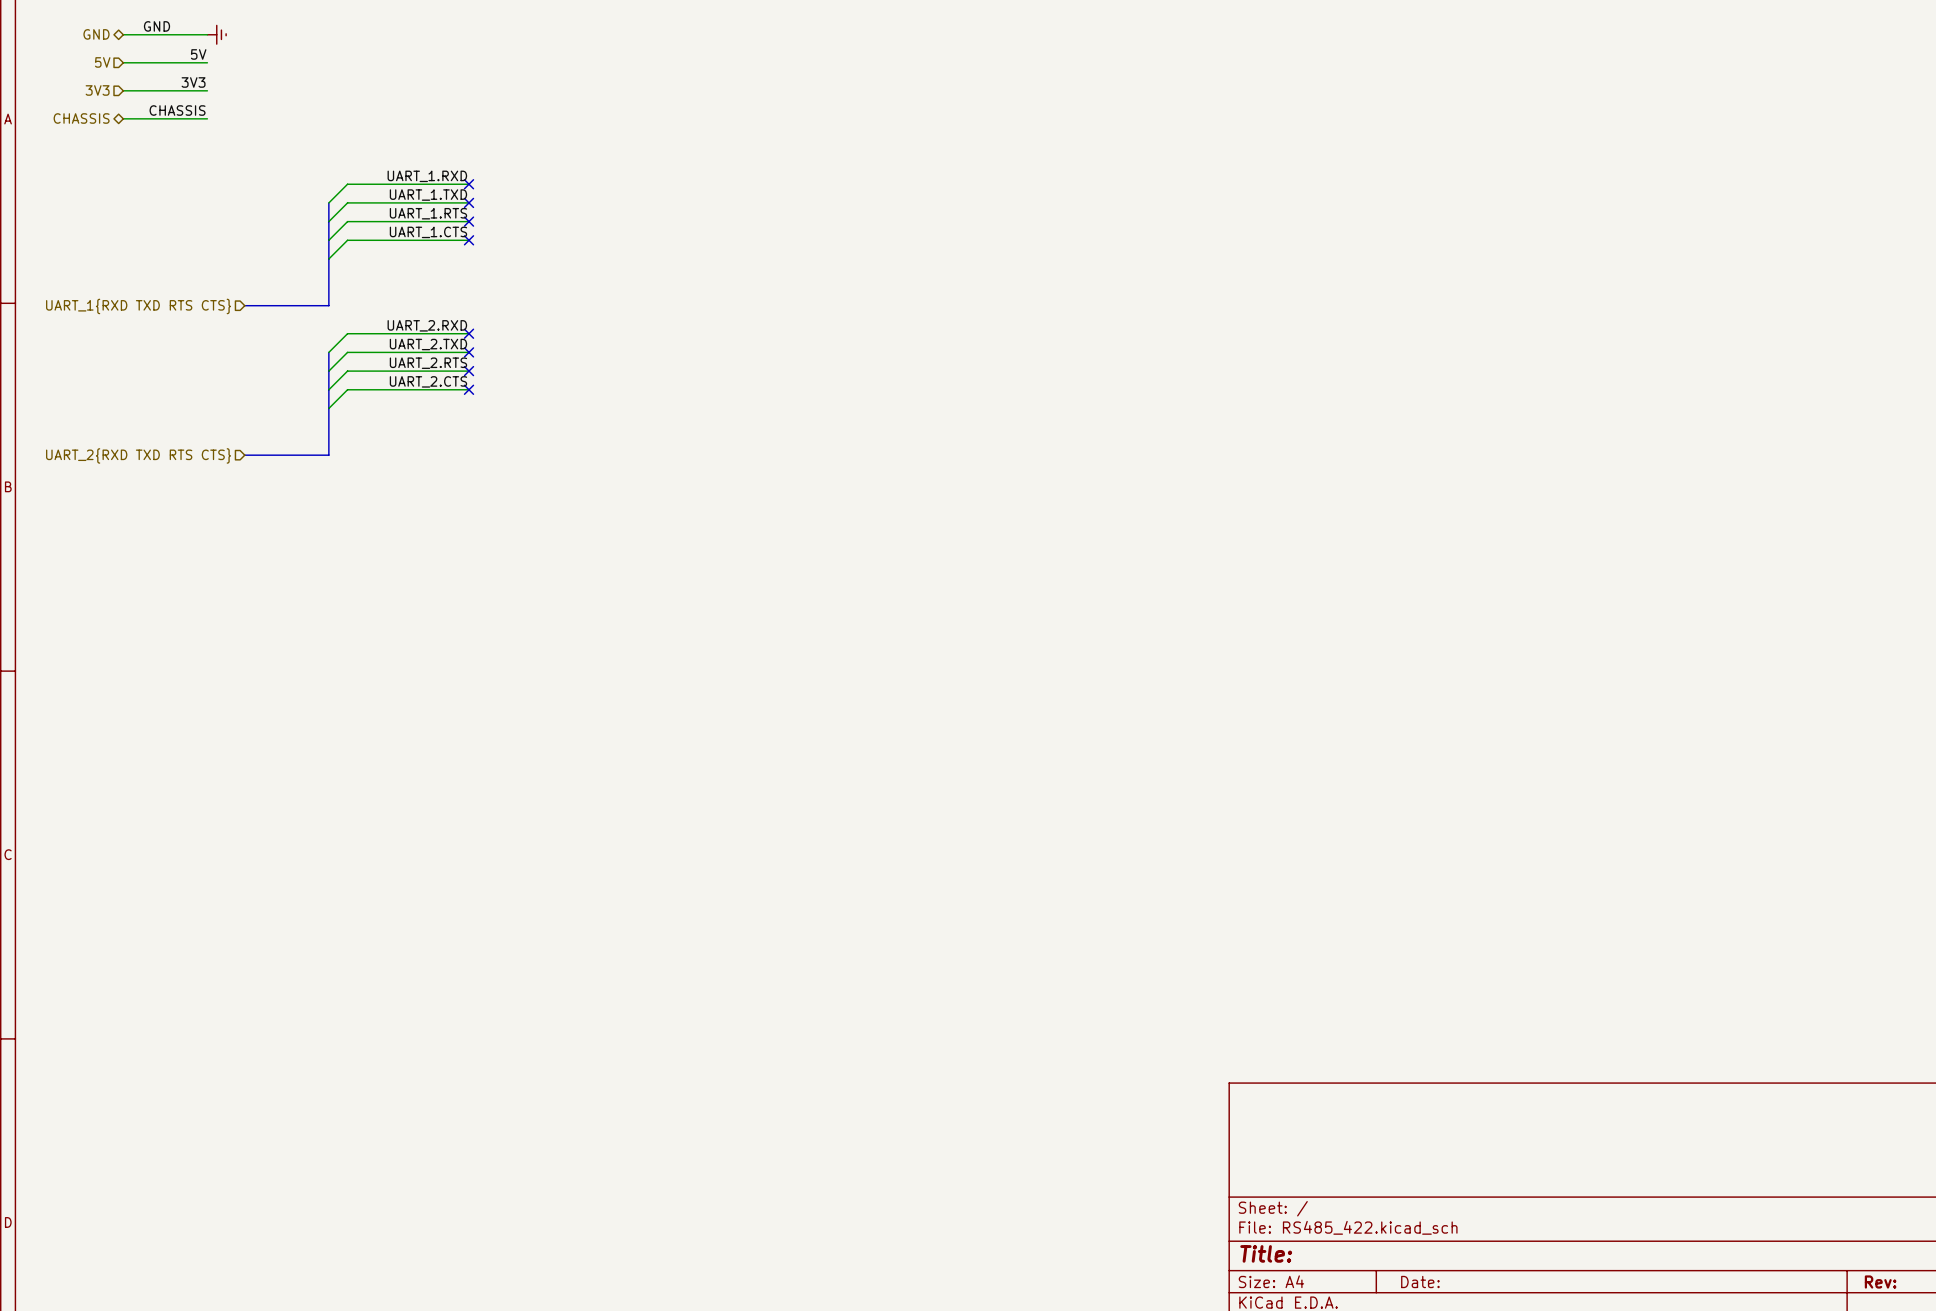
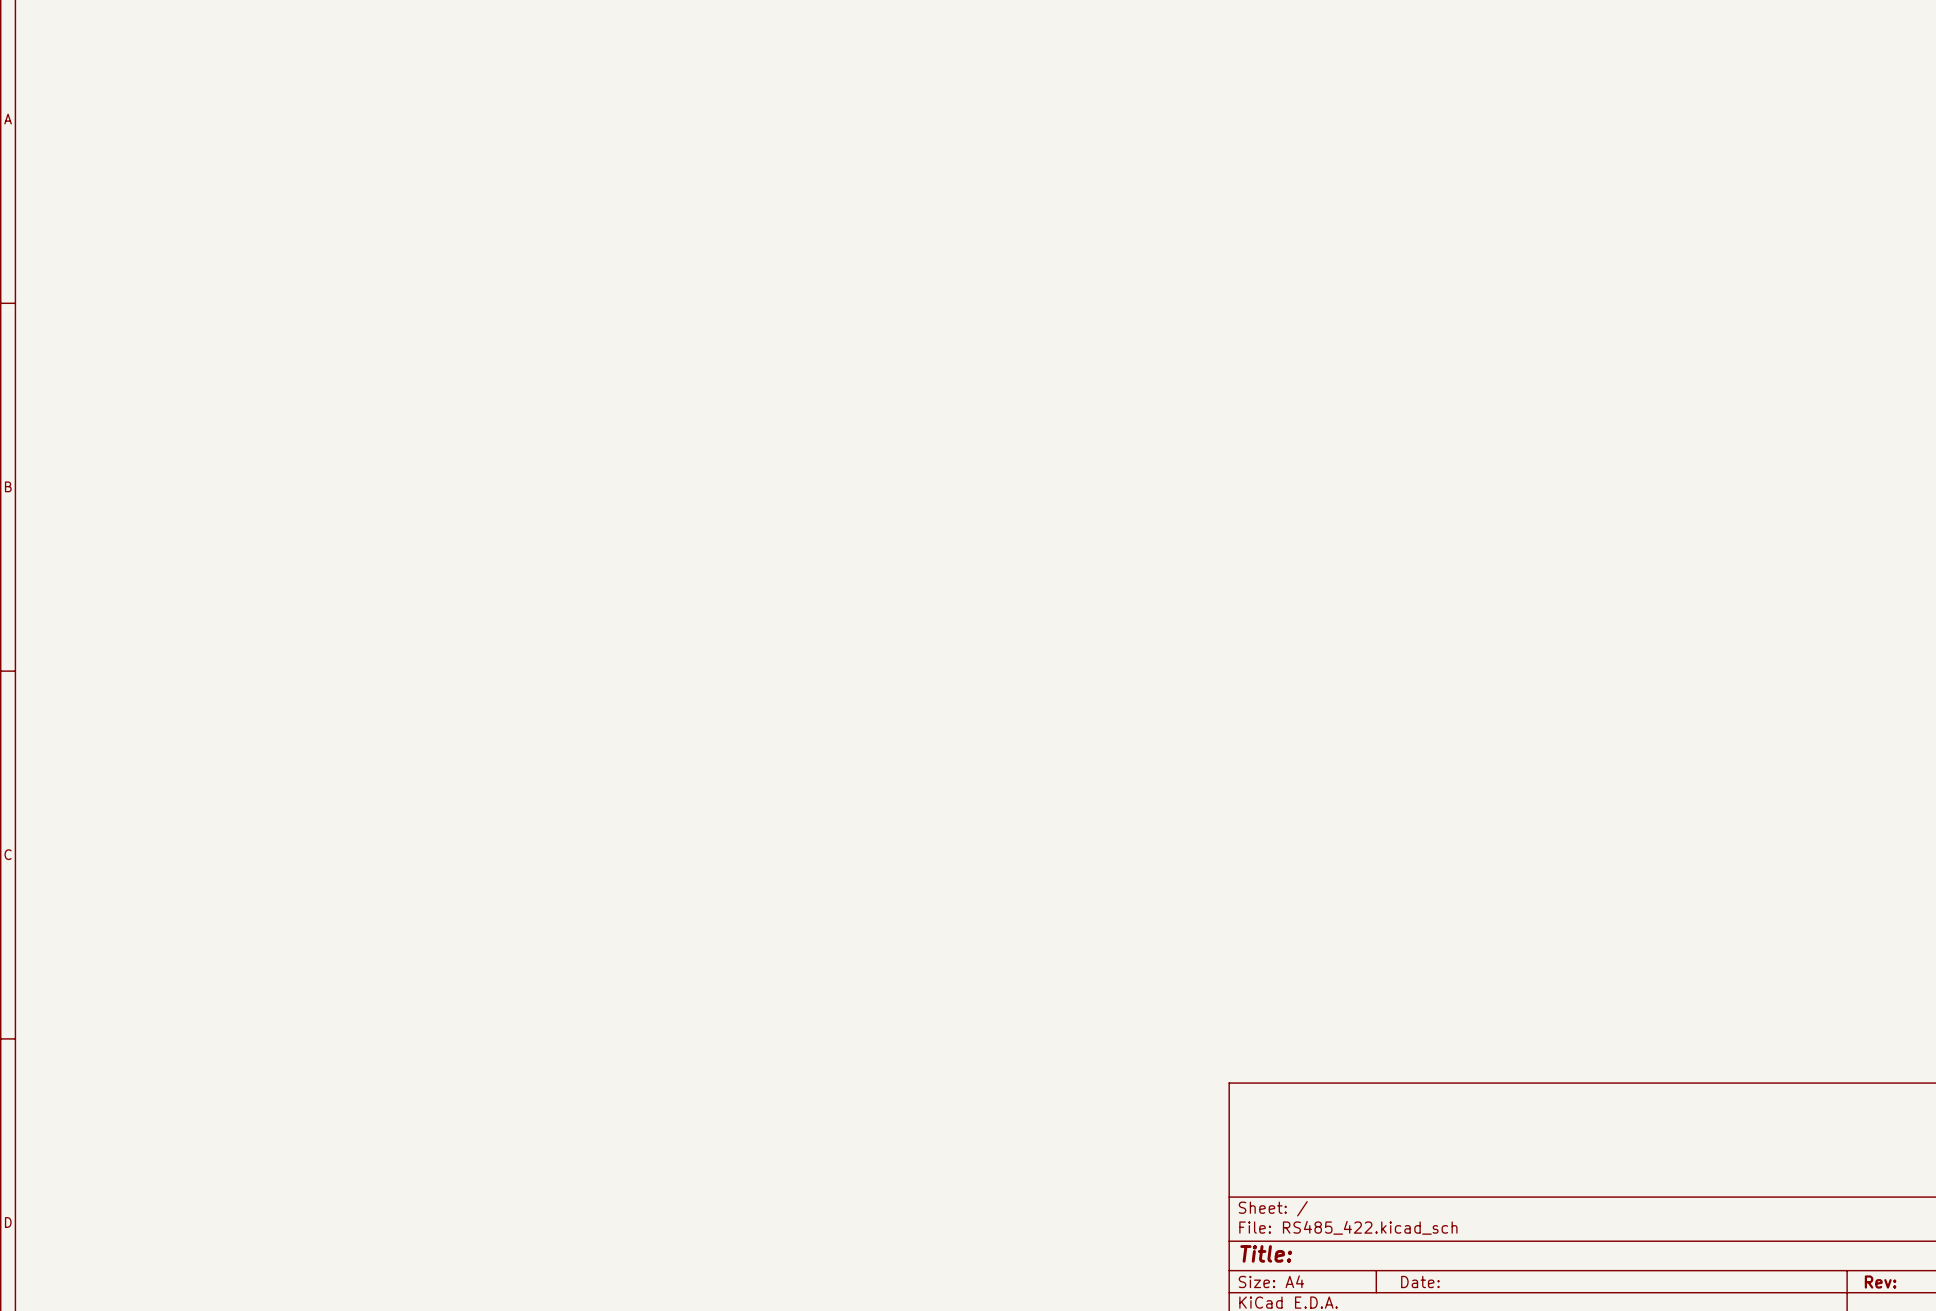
label: GND (156, 26) -> none
hierarchical label: GND (96, 34) -> none
wire: (123, 34) (207, 34) -> none
power symbol: (216, 34) -> none
label: 5V (198, 54) -> none
hierarchical label: 5V (102, 62) -> none
wire: (123, 62) (207, 62) -> none
label: 3V3 (193, 82) -> none
hierarchical label: 3V3 (97, 90) -> none
wire: (123, 90) (207, 90) -> none
label: CHASSIS (177, 110) -> none
hierarchical label: CHASSIS (81, 118) -> none
wire: (123, 118) (207, 118) -> none
label: UART_1.RXD (427, 176) -> none
wire: (469, 184) (347, 184) (328, 202) -> none
no-connect mark: (469, 184) -> none
label: UART_1.TXD (428, 195) -> none
bus: (328, 202) (328, 305) (244, 305) -> none
wire: (347, 202) (469, 202) -> none
wire: (347, 202) (328, 221) -> none
no-connect mark: (469, 202) -> none
label: UART_1.RTS (428, 213) -> none
wire: (469, 221) (347, 221) (328, 240) -> none
no-connect mark: (469, 221) -> none
label: UART_1.CTS (428, 232) -> none
wire: (469, 240) (347, 240) (328, 258) -> none
no-connect mark: (469, 240) -> none
hierarchical label: UART_1{RXD TXD RTS CTS} (138, 306) -> none
label: UART_2.RXD (427, 325) -> none
wire: (347, 333) (328, 352) -> none
wire: (347, 333) (469, 333) -> none
no-connect mark: (469, 333) -> none
label: UART_2.TXD (428, 344) -> none
bus: (328, 352) (328, 455) (244, 455) -> none
wire: (469, 352) (347, 352) (328, 371) -> none
no-connect mark: (469, 352) -> none
label: UART_2.RTS (428, 363) -> none
wire: (347, 371) (328, 389) -> none
wire: (347, 371) (469, 371) -> none
no-connect mark: (469, 371) -> none
label: UART_2.CTS (428, 381) -> none
wire: (469, 389) (347, 389) (328, 408) -> none
no-connect mark: (469, 389) -> none
hierarchical label: UART_2{RXD TXD RTS CTS} (138, 455) -> none

